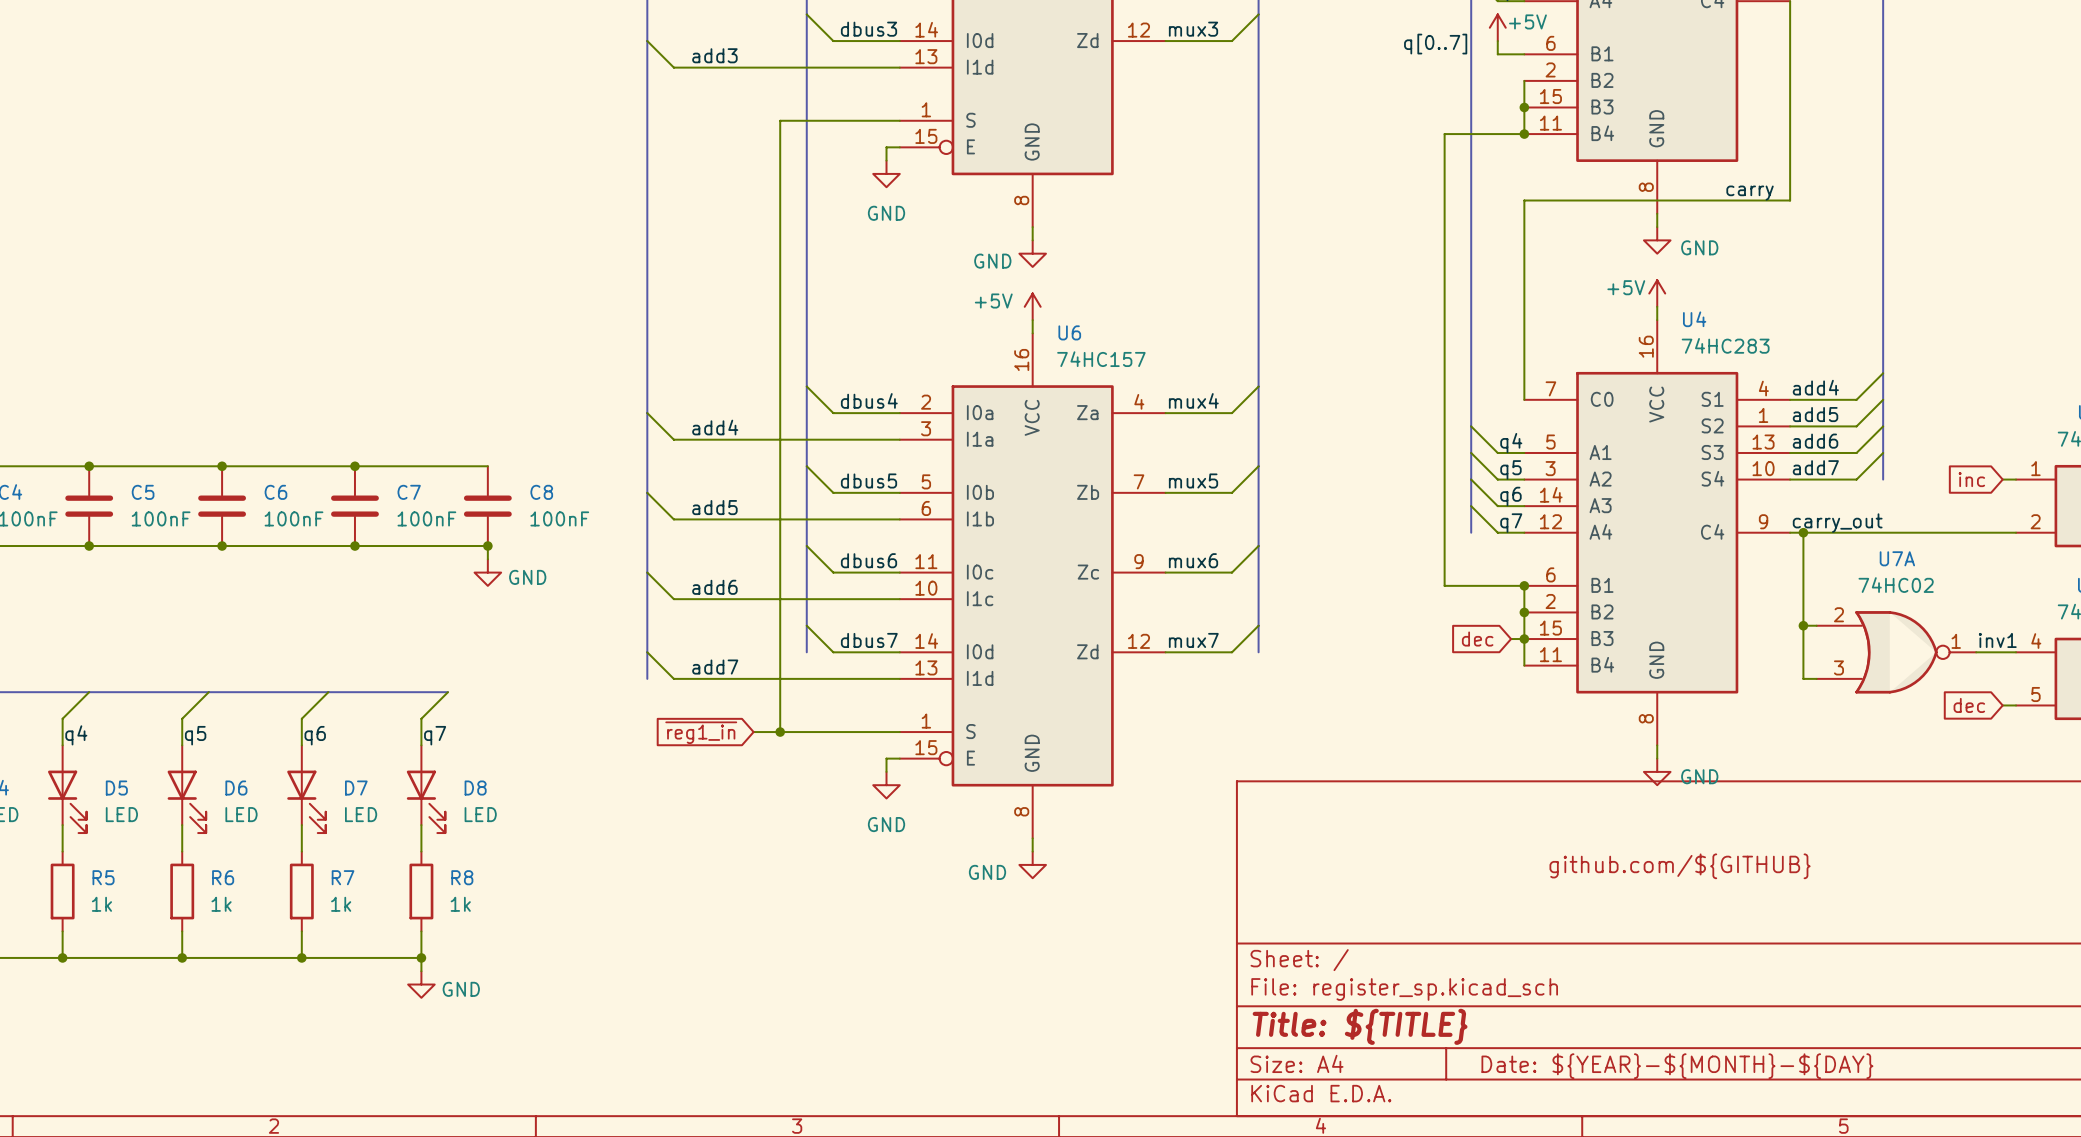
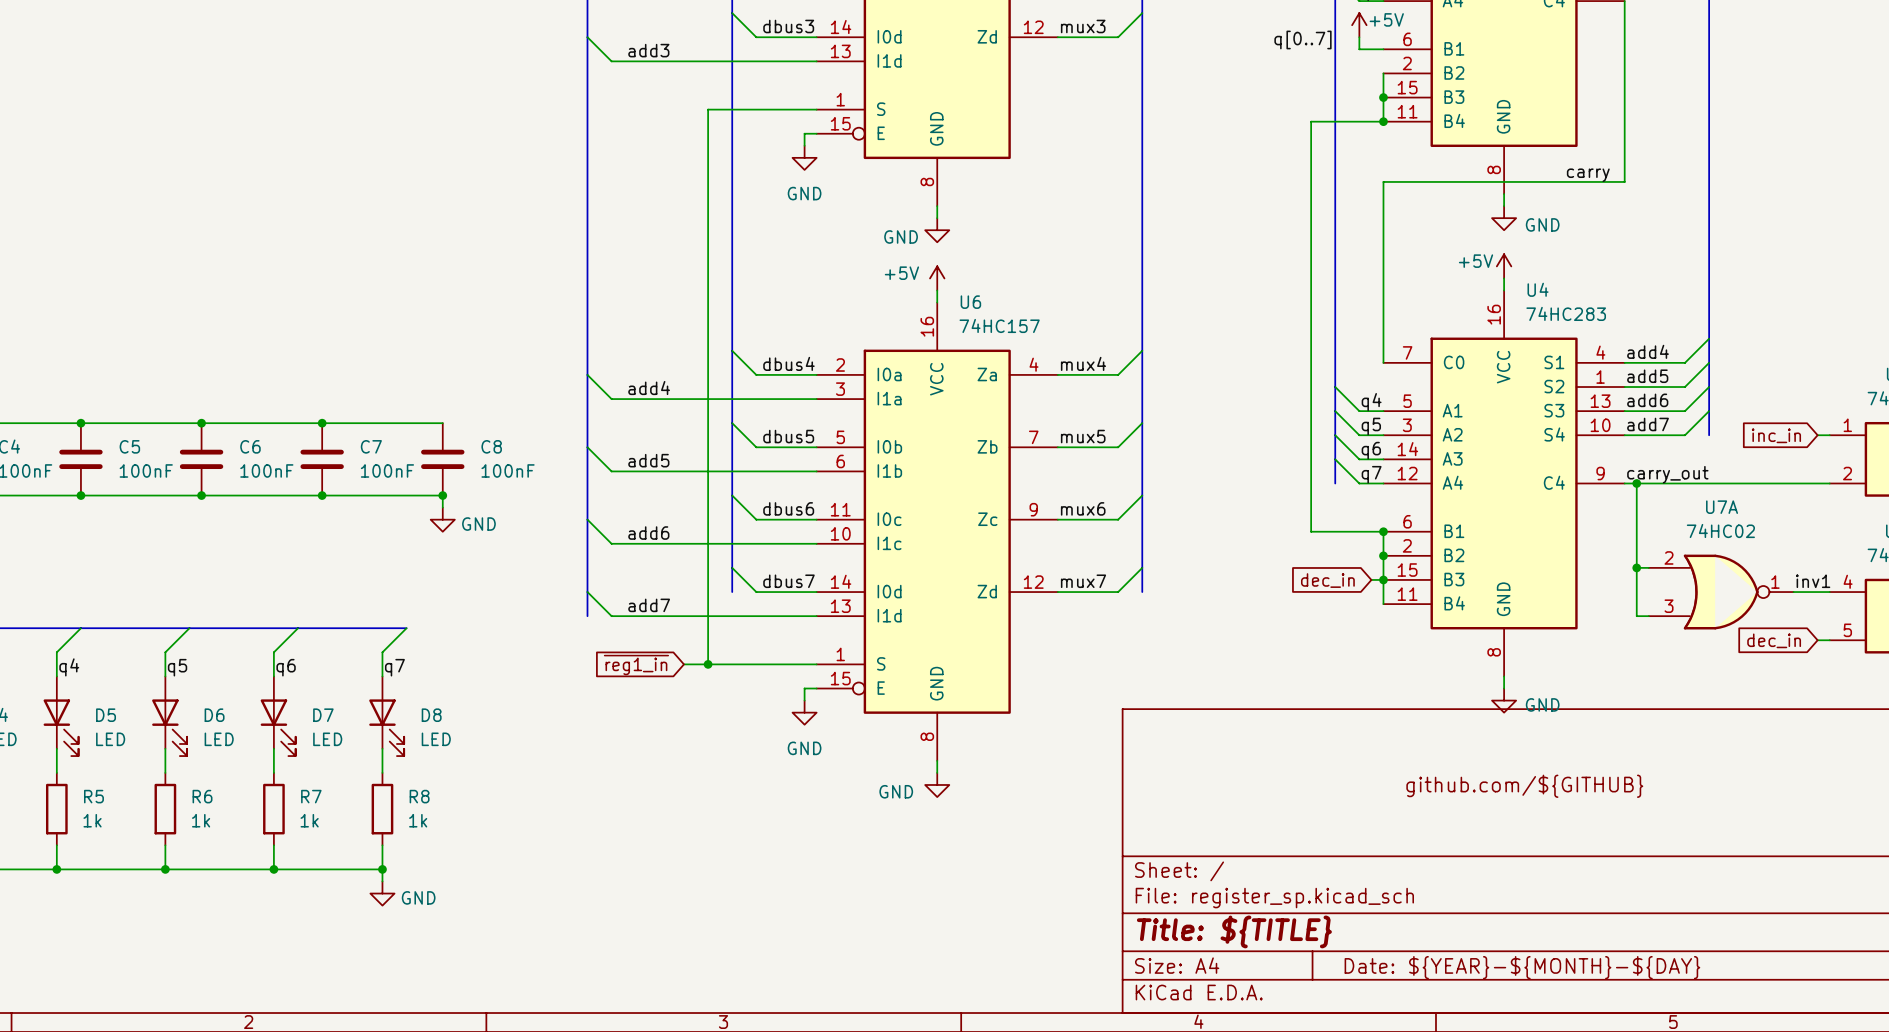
global label: inc (1971, 479) -> inc_in (1776, 435)
global label: dec (1477, 639) -> dec_in (1327, 580)
global label: dec (1969, 705) -> dec_in (1774, 640)

